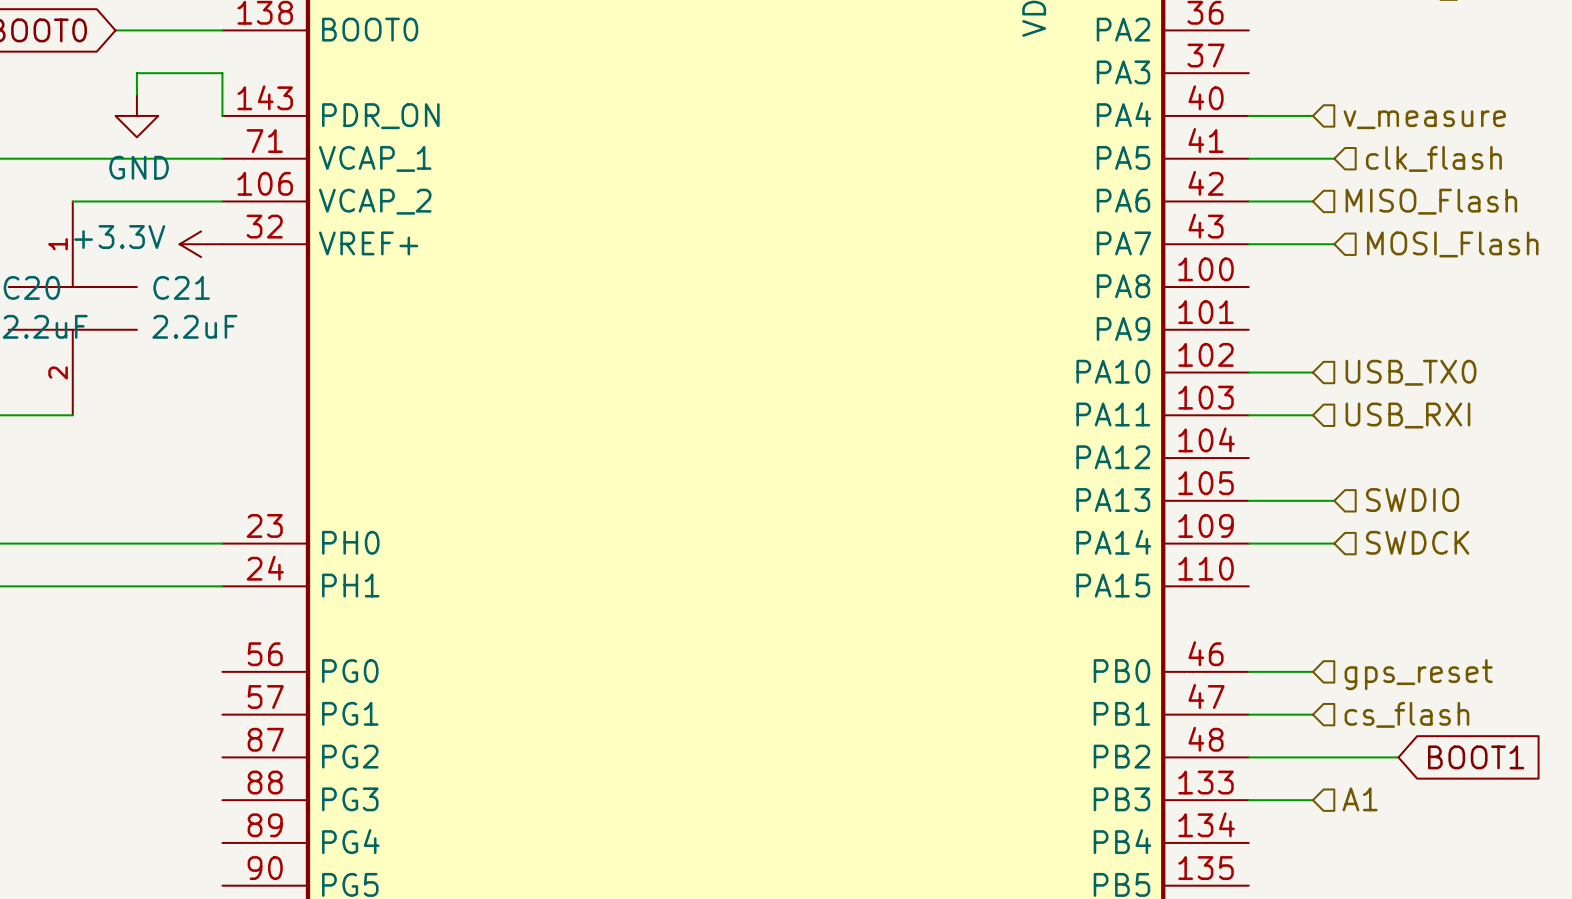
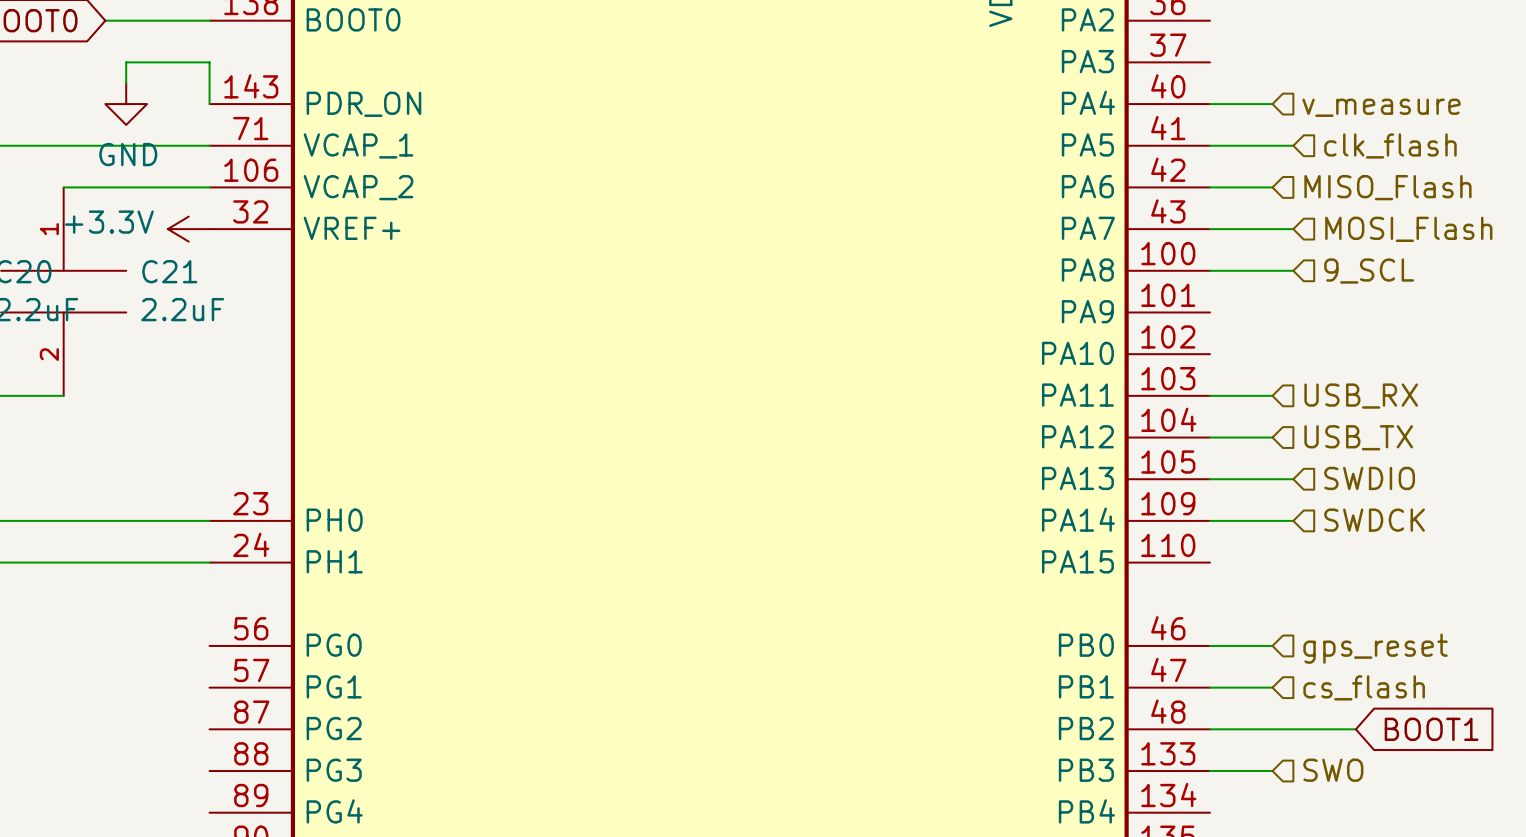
wire: none -> (1209, 270) (1293, 270)
hierarchical label: none -> 9_SCL (1369, 271)
wire: (1248, 372) (1312, 372) -> (1209, 437) (1272, 437)
hierarchical label: USB_TX0 (1411, 372) -> none
hierarchical label: USB_RXI (1407, 415) -> USB_RX (1361, 396)
hierarchical label: none -> USB_TX (1358, 437)
hierarchical label: A1 (1360, 799) -> SWO (1333, 770)

